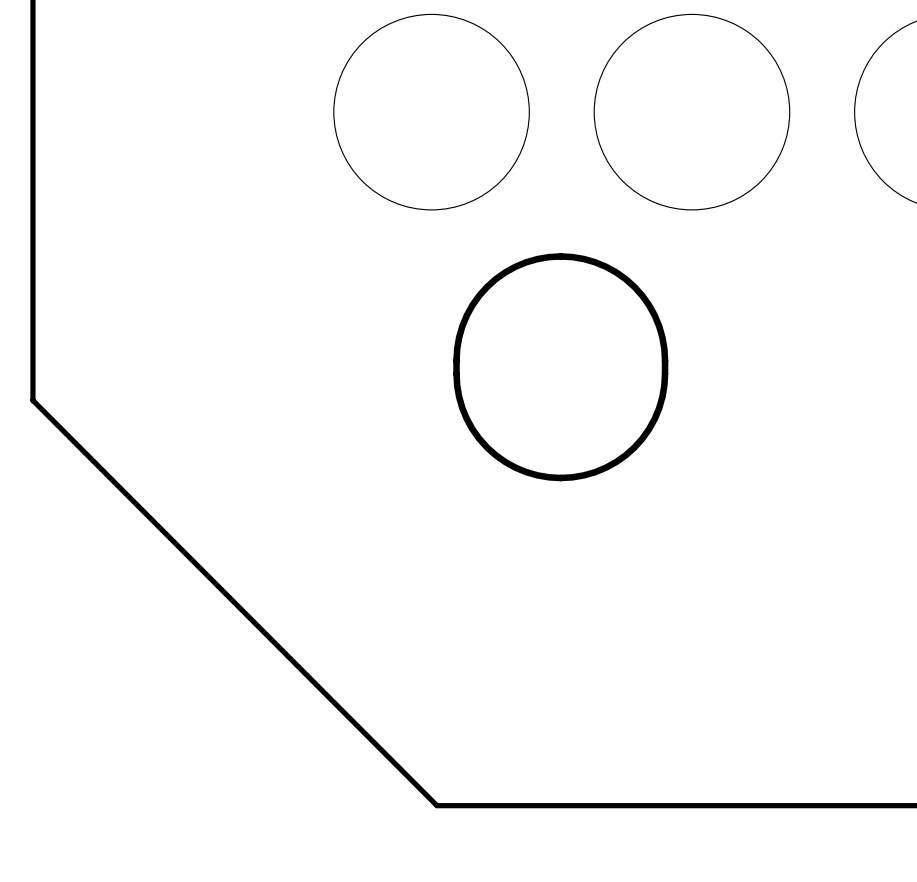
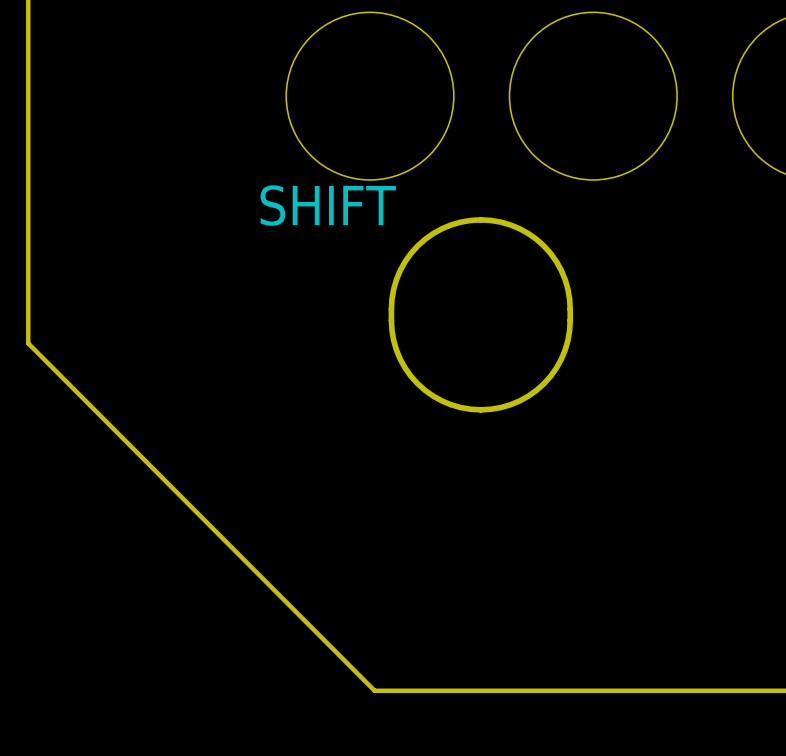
text: none -> SHIFT (328, 205)

